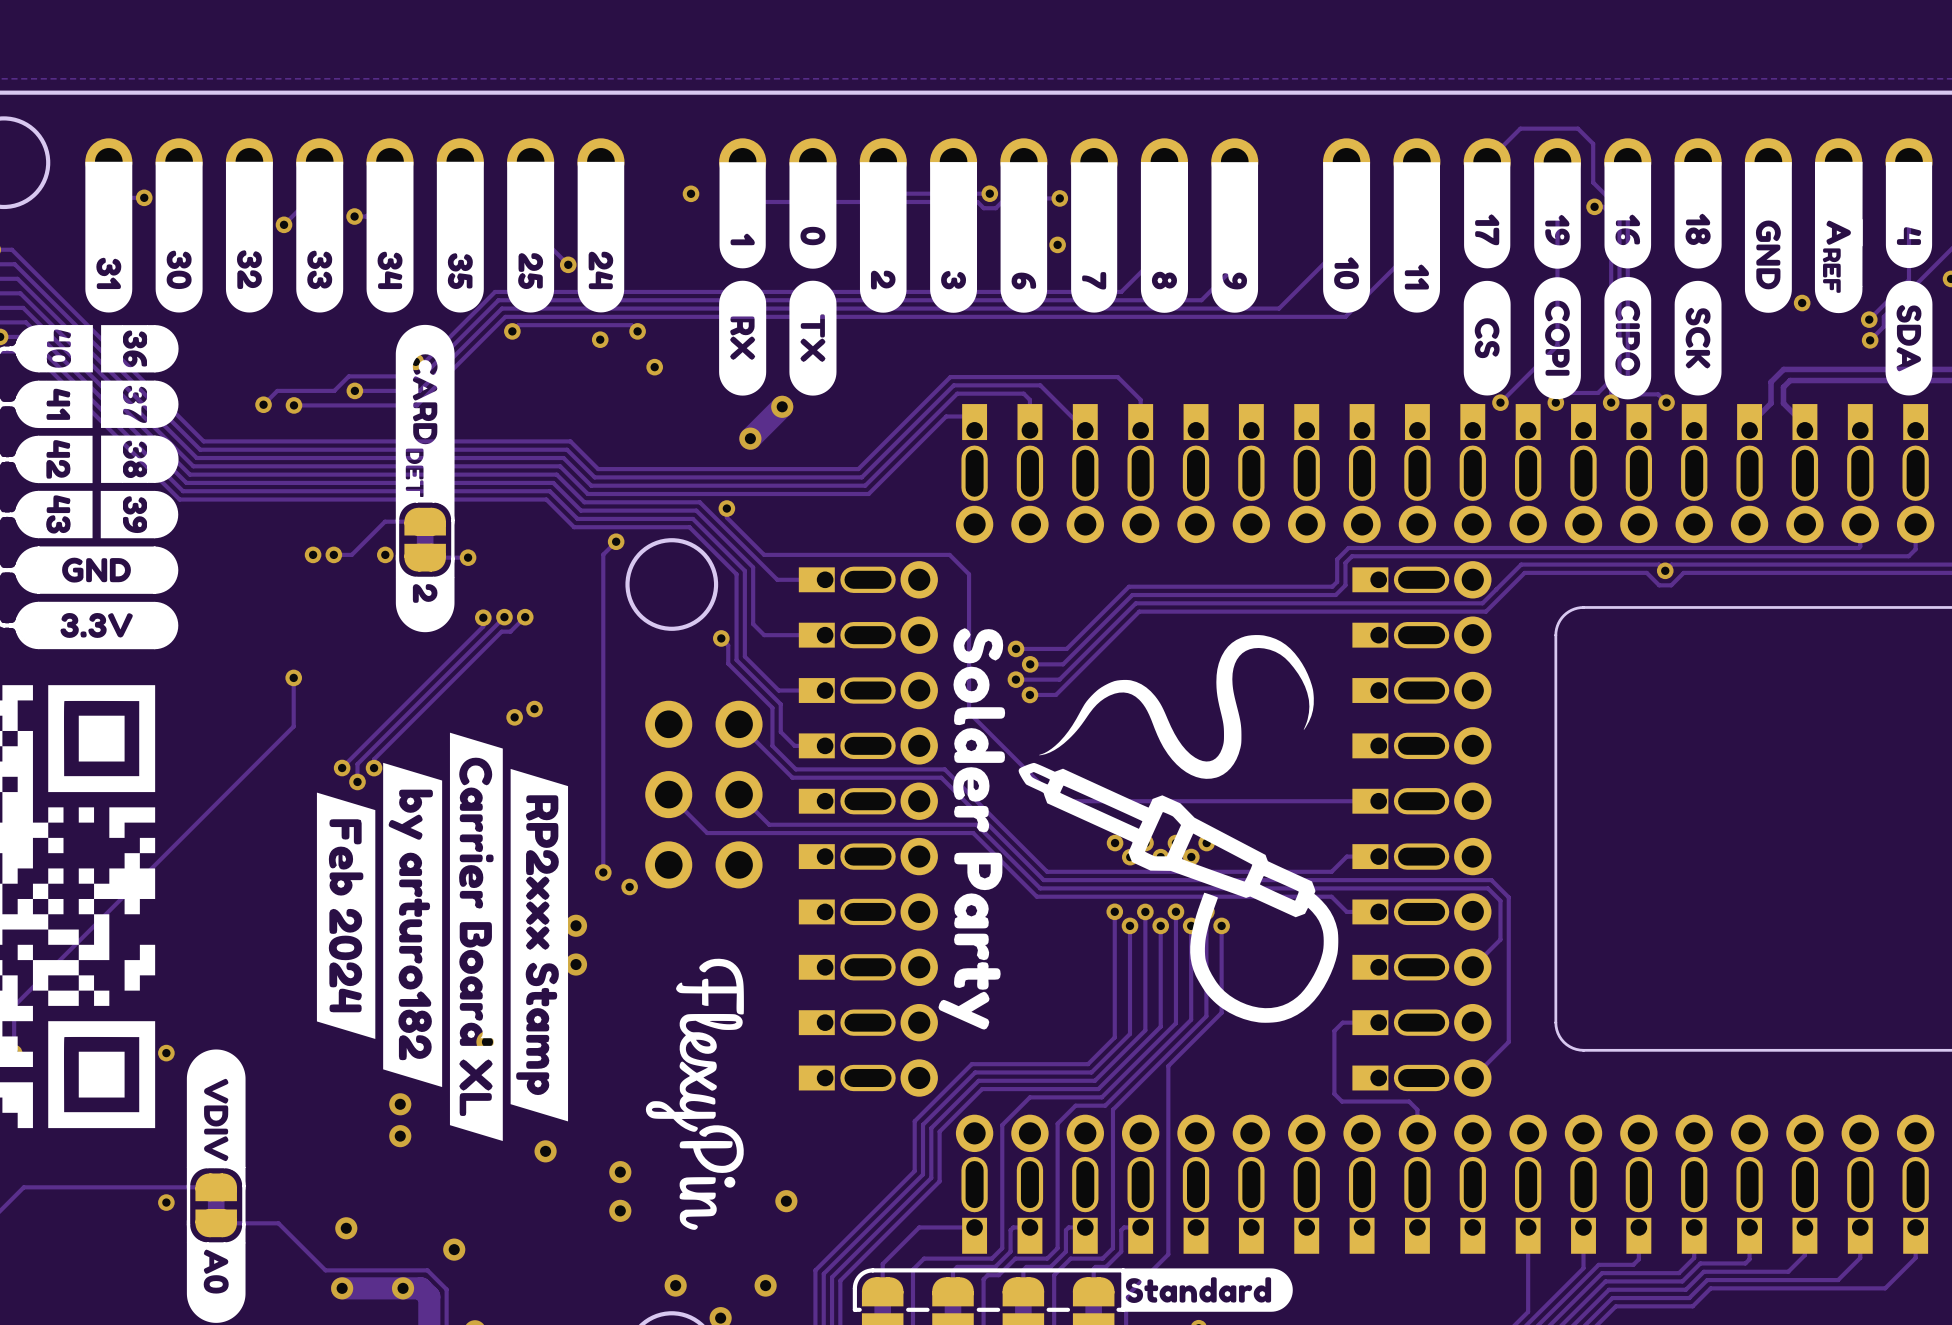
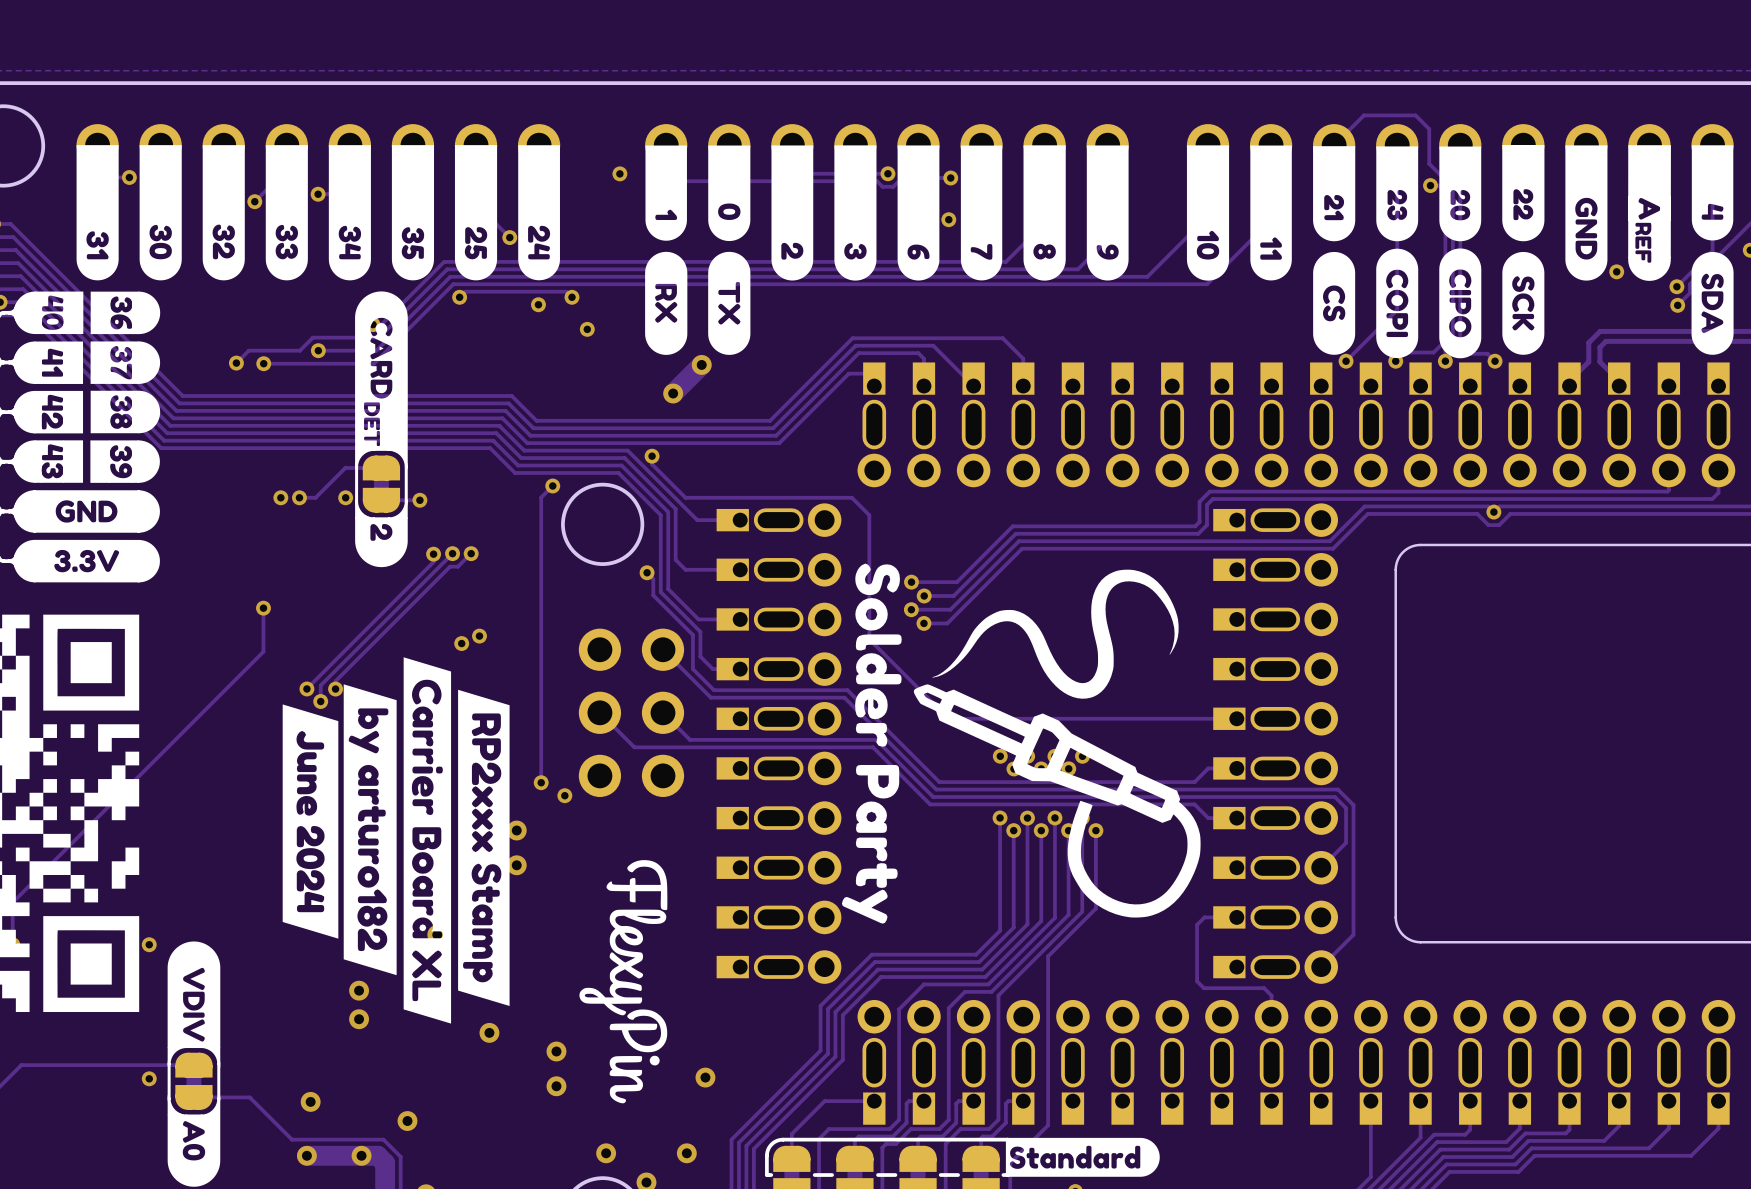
drawing shape: [1464, 162, 1511, 269] -> [1313, 146, 1356, 242]
drawing shape: [1534, 162, 1581, 269] -> [1376, 146, 1419, 242]
drawing shape: [1604, 162, 1652, 269] -> [1439, 146, 1482, 242]
drawing shape: [1674, 162, 1722, 269] -> [1502, 145, 1545, 242]
drawing shape: [316, 792, 376, 1039] -> [282, 704, 339, 939]

